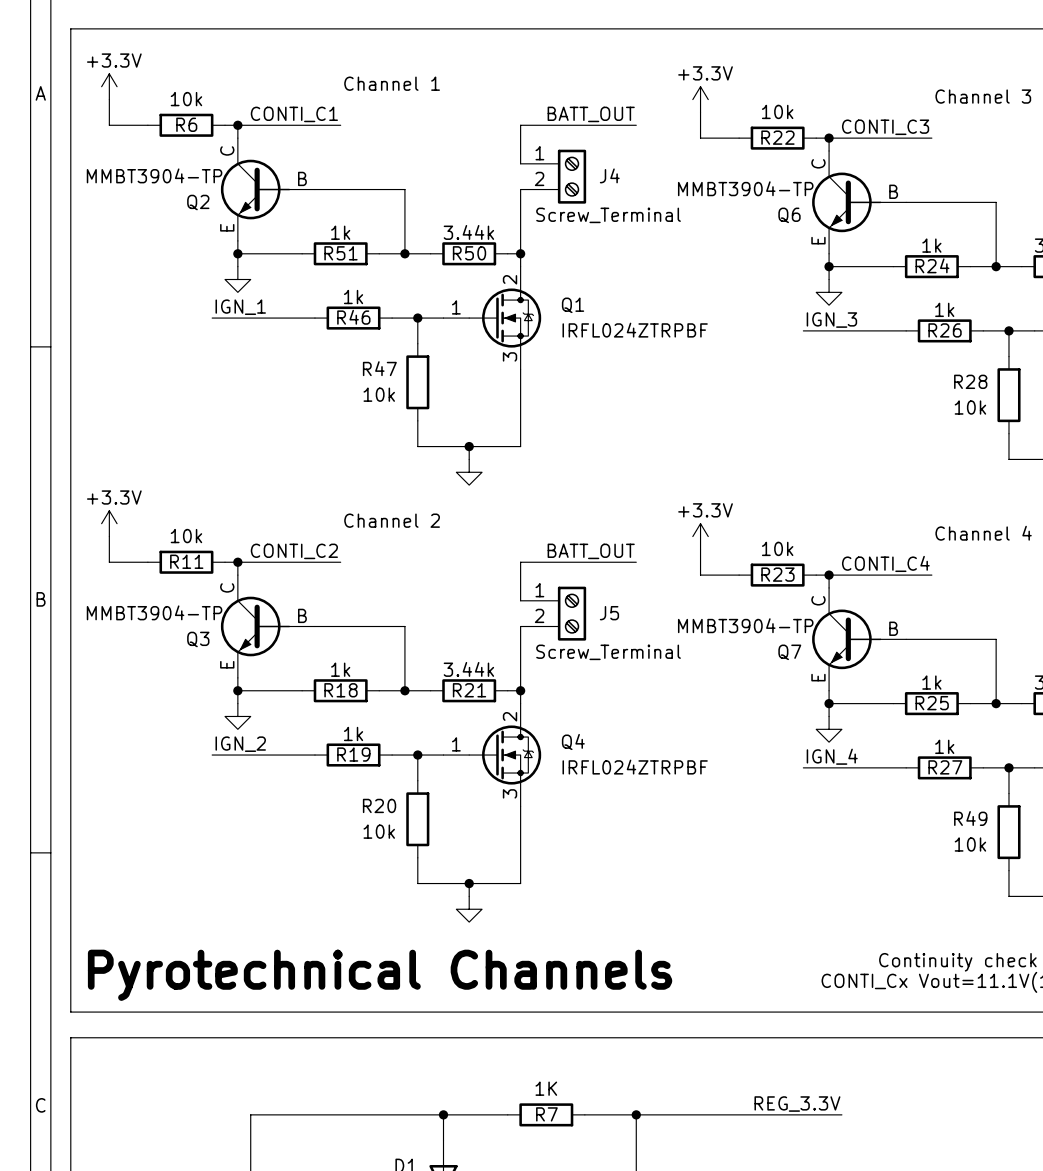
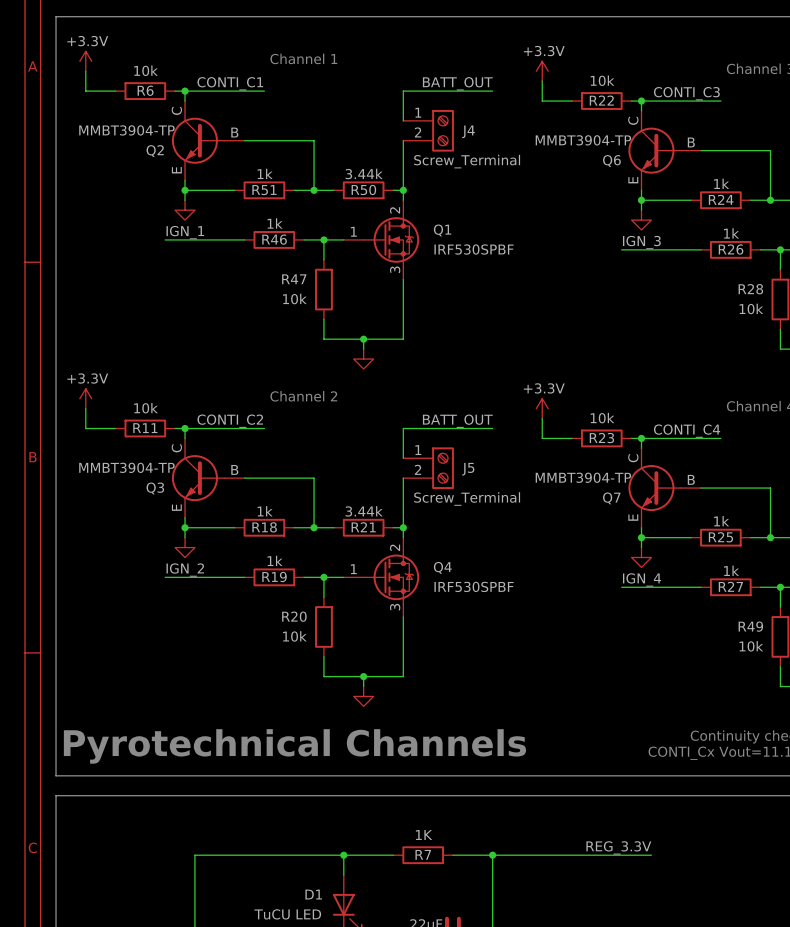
Q1 value: IRFL024ZTRPBF (635, 330) -> IRF530SPBF (474, 249)
Q4 value: IRFL024ZTRPBF (635, 767) -> IRF530SPBF (474, 586)

